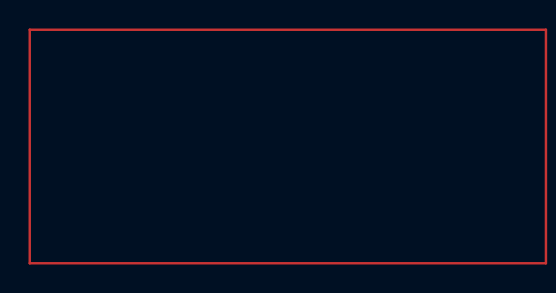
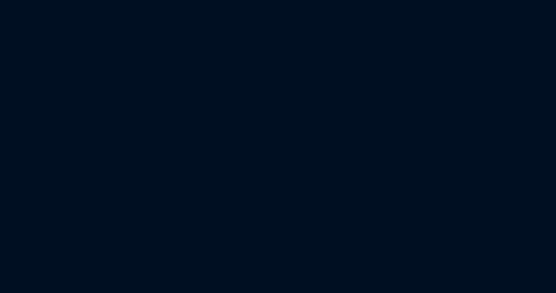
top track: (545, 29) (29, 29) (29, 263) (545, 263) (545, 29) -> none

